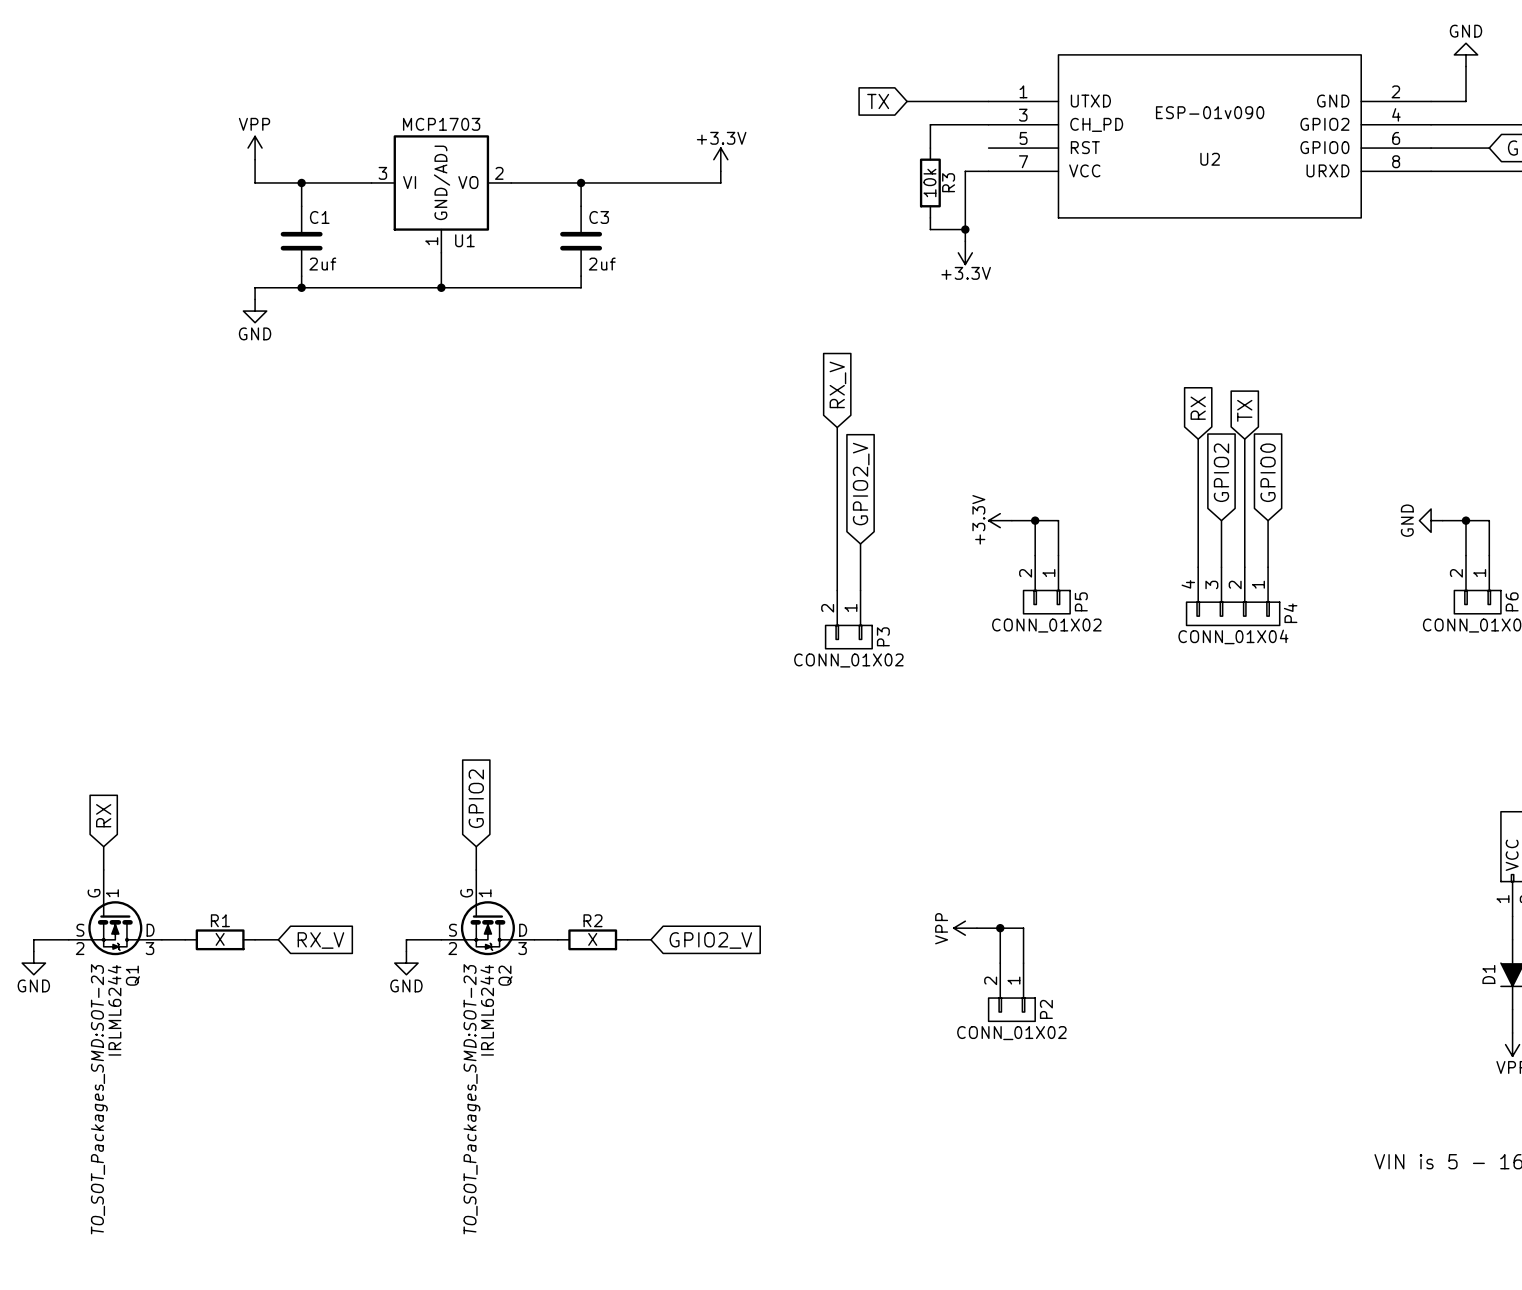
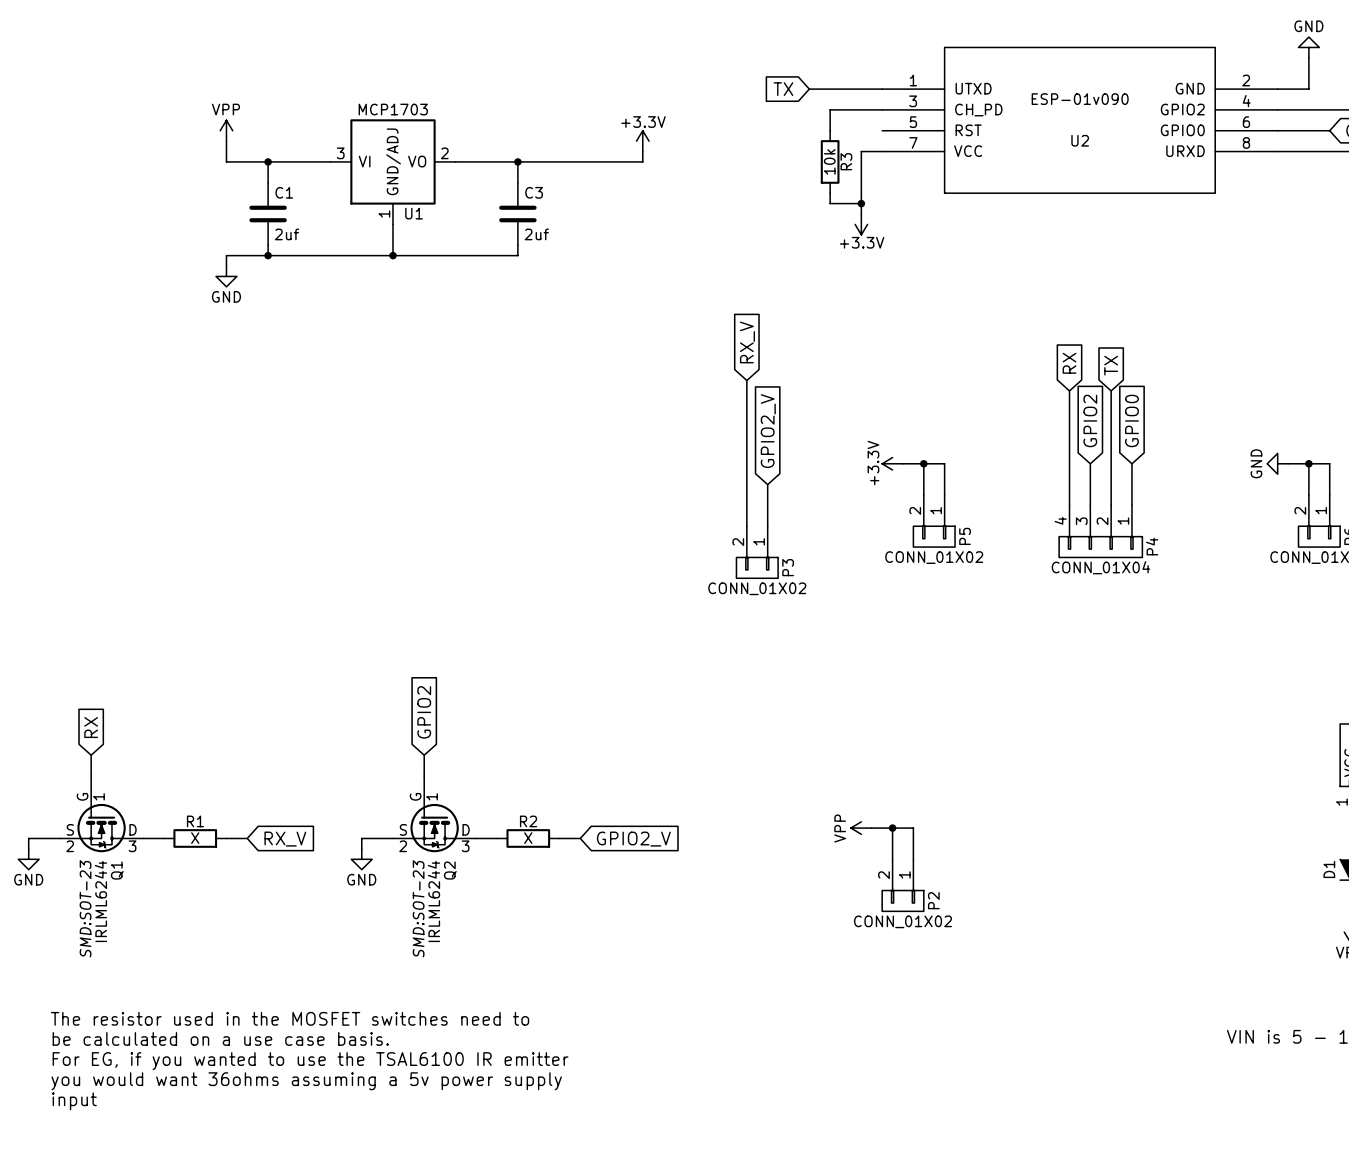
Q1 text: TO_SOT_Packages_SMD:SOT-23 (99, 1099) -> SMD:SOT-23 (85, 908)
Q2 text: TO_SOT_Packages_SMD:SOT-23 (471, 1099) -> SMD:SOT-23 (418, 908)
text: none -> The resistor used in the MOSFET switches need to (290, 1018)
text: none -> be calculated on a use case basis. (220, 1038)
text: none -> For EG, if you wanted to use the TSAL6100 IR emitter (310, 1061)
text: none -> you would want 36ohms assuming a 5v power supply (306, 1081)
text: none -> input (74, 1101)

